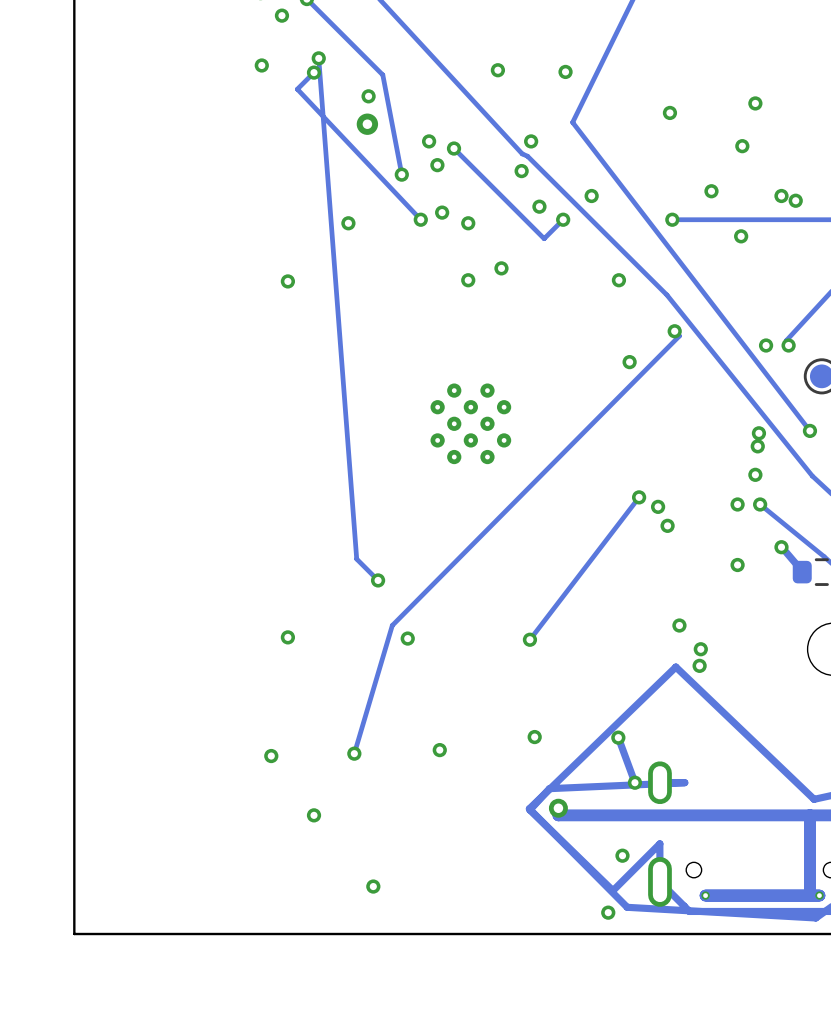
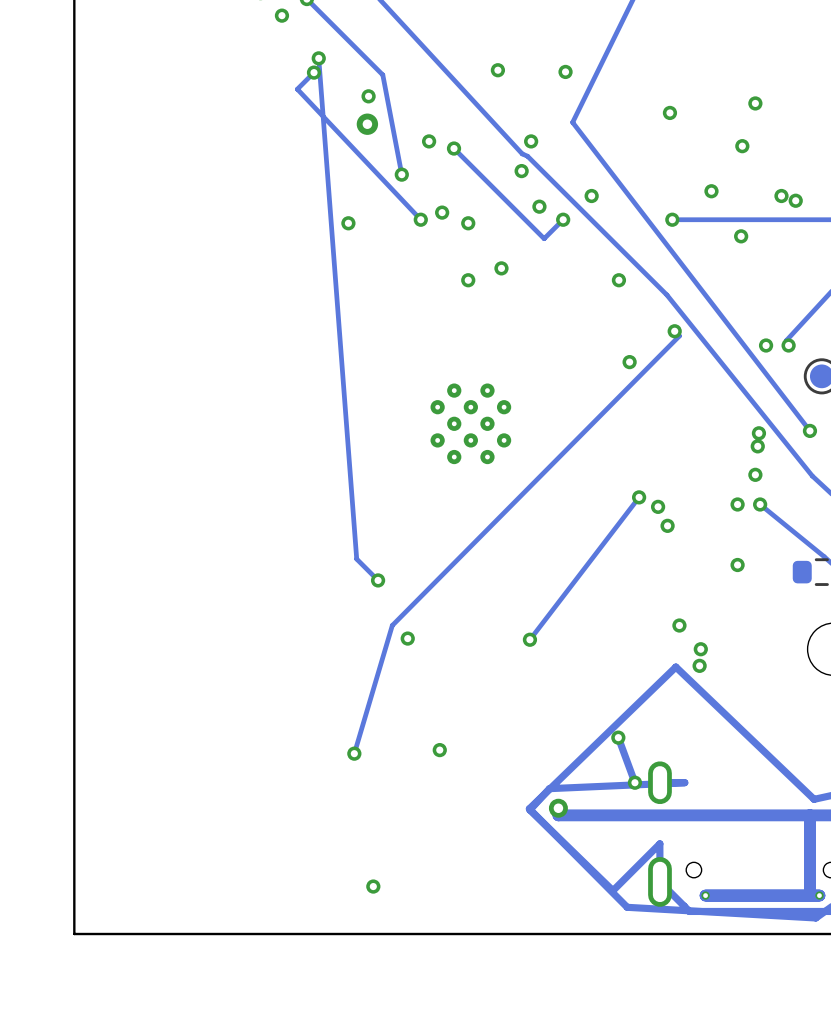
via: (261, 65) -> none
via: (437, 165) -> none
via: (287, 281) -> none
track: (781, 547) (797, 565) -> none
via: (781, 547) -> none
via: (287, 637) -> none
via: (534, 737) -> none
via: (271, 756) -> none
via: (314, 815) -> none
via: (622, 855) -> none
via: (608, 912) -> none

